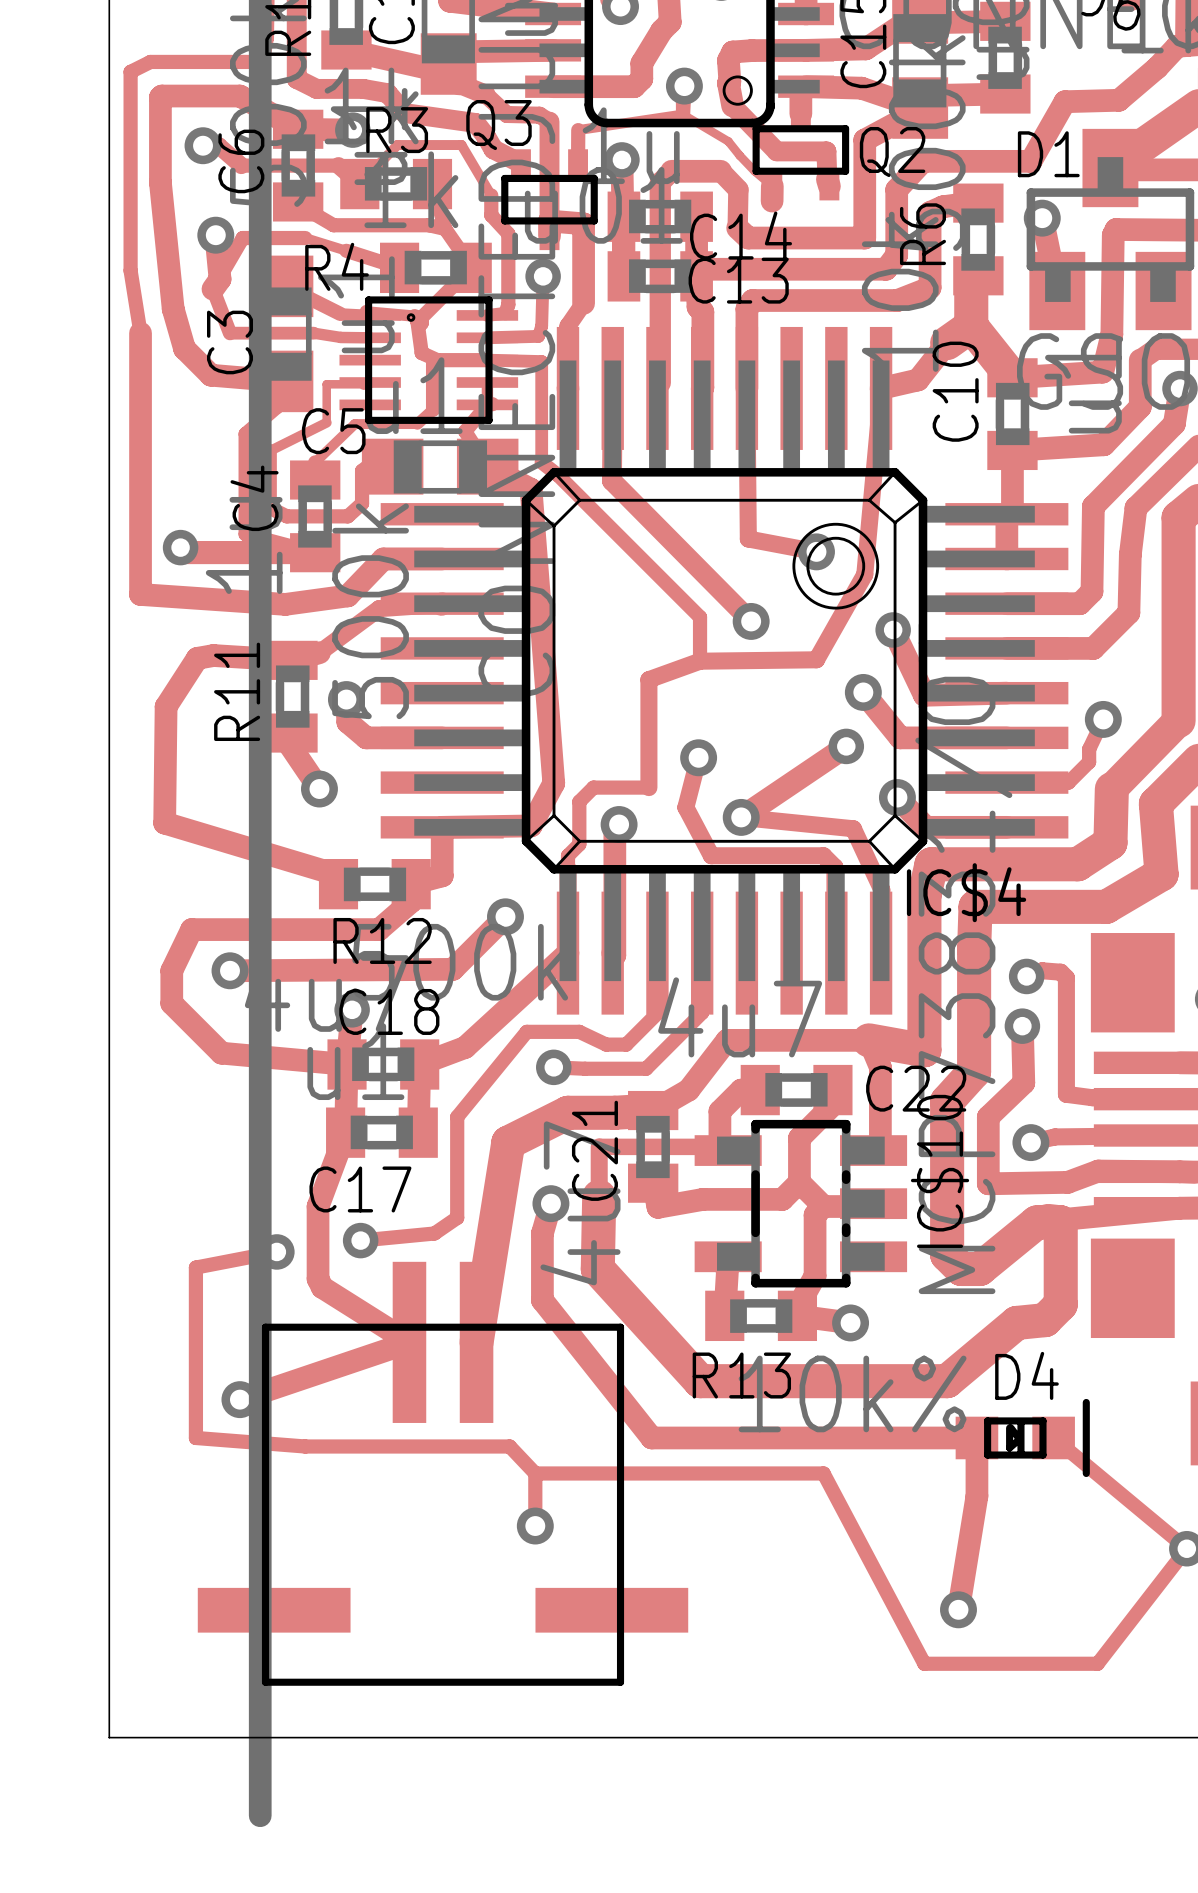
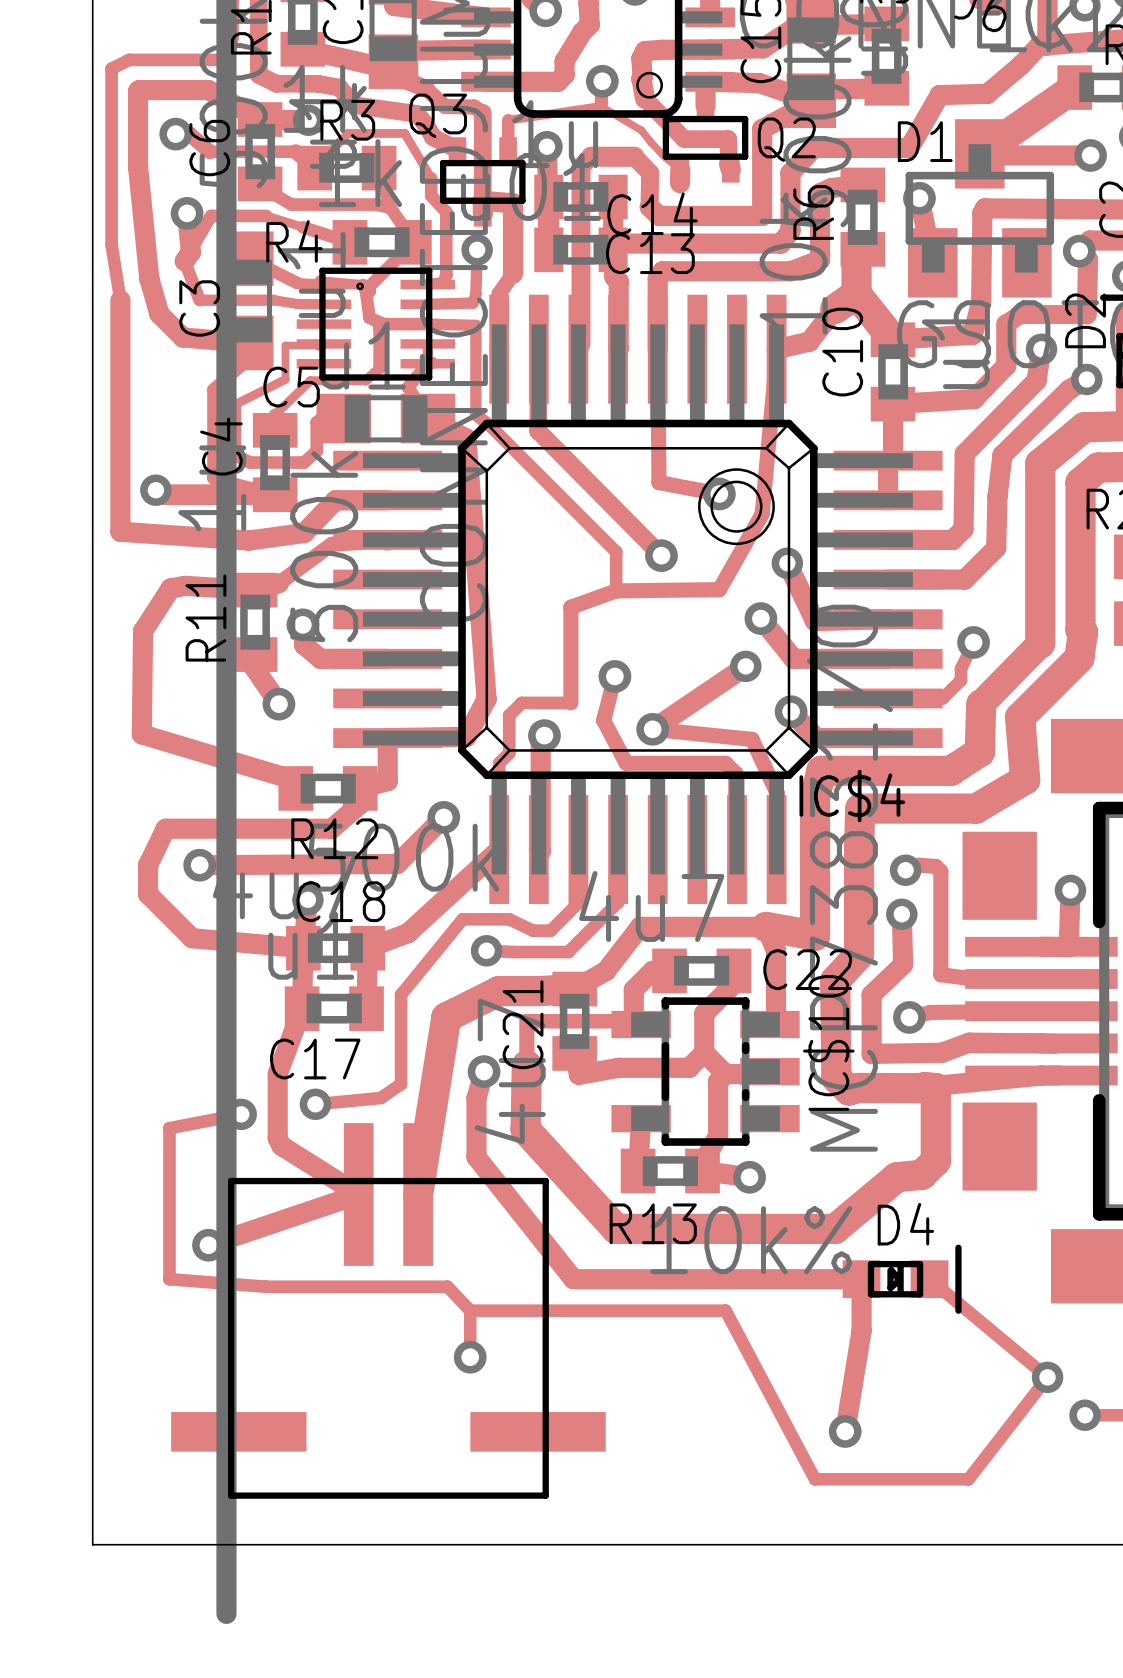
track: (947, 1101) (947, 1254) (961, 1268) (979, 1268) (1036, 1222) -> (835, 980) (836, 1077) (848, 1090) (859, 1087) (914, 1088)

